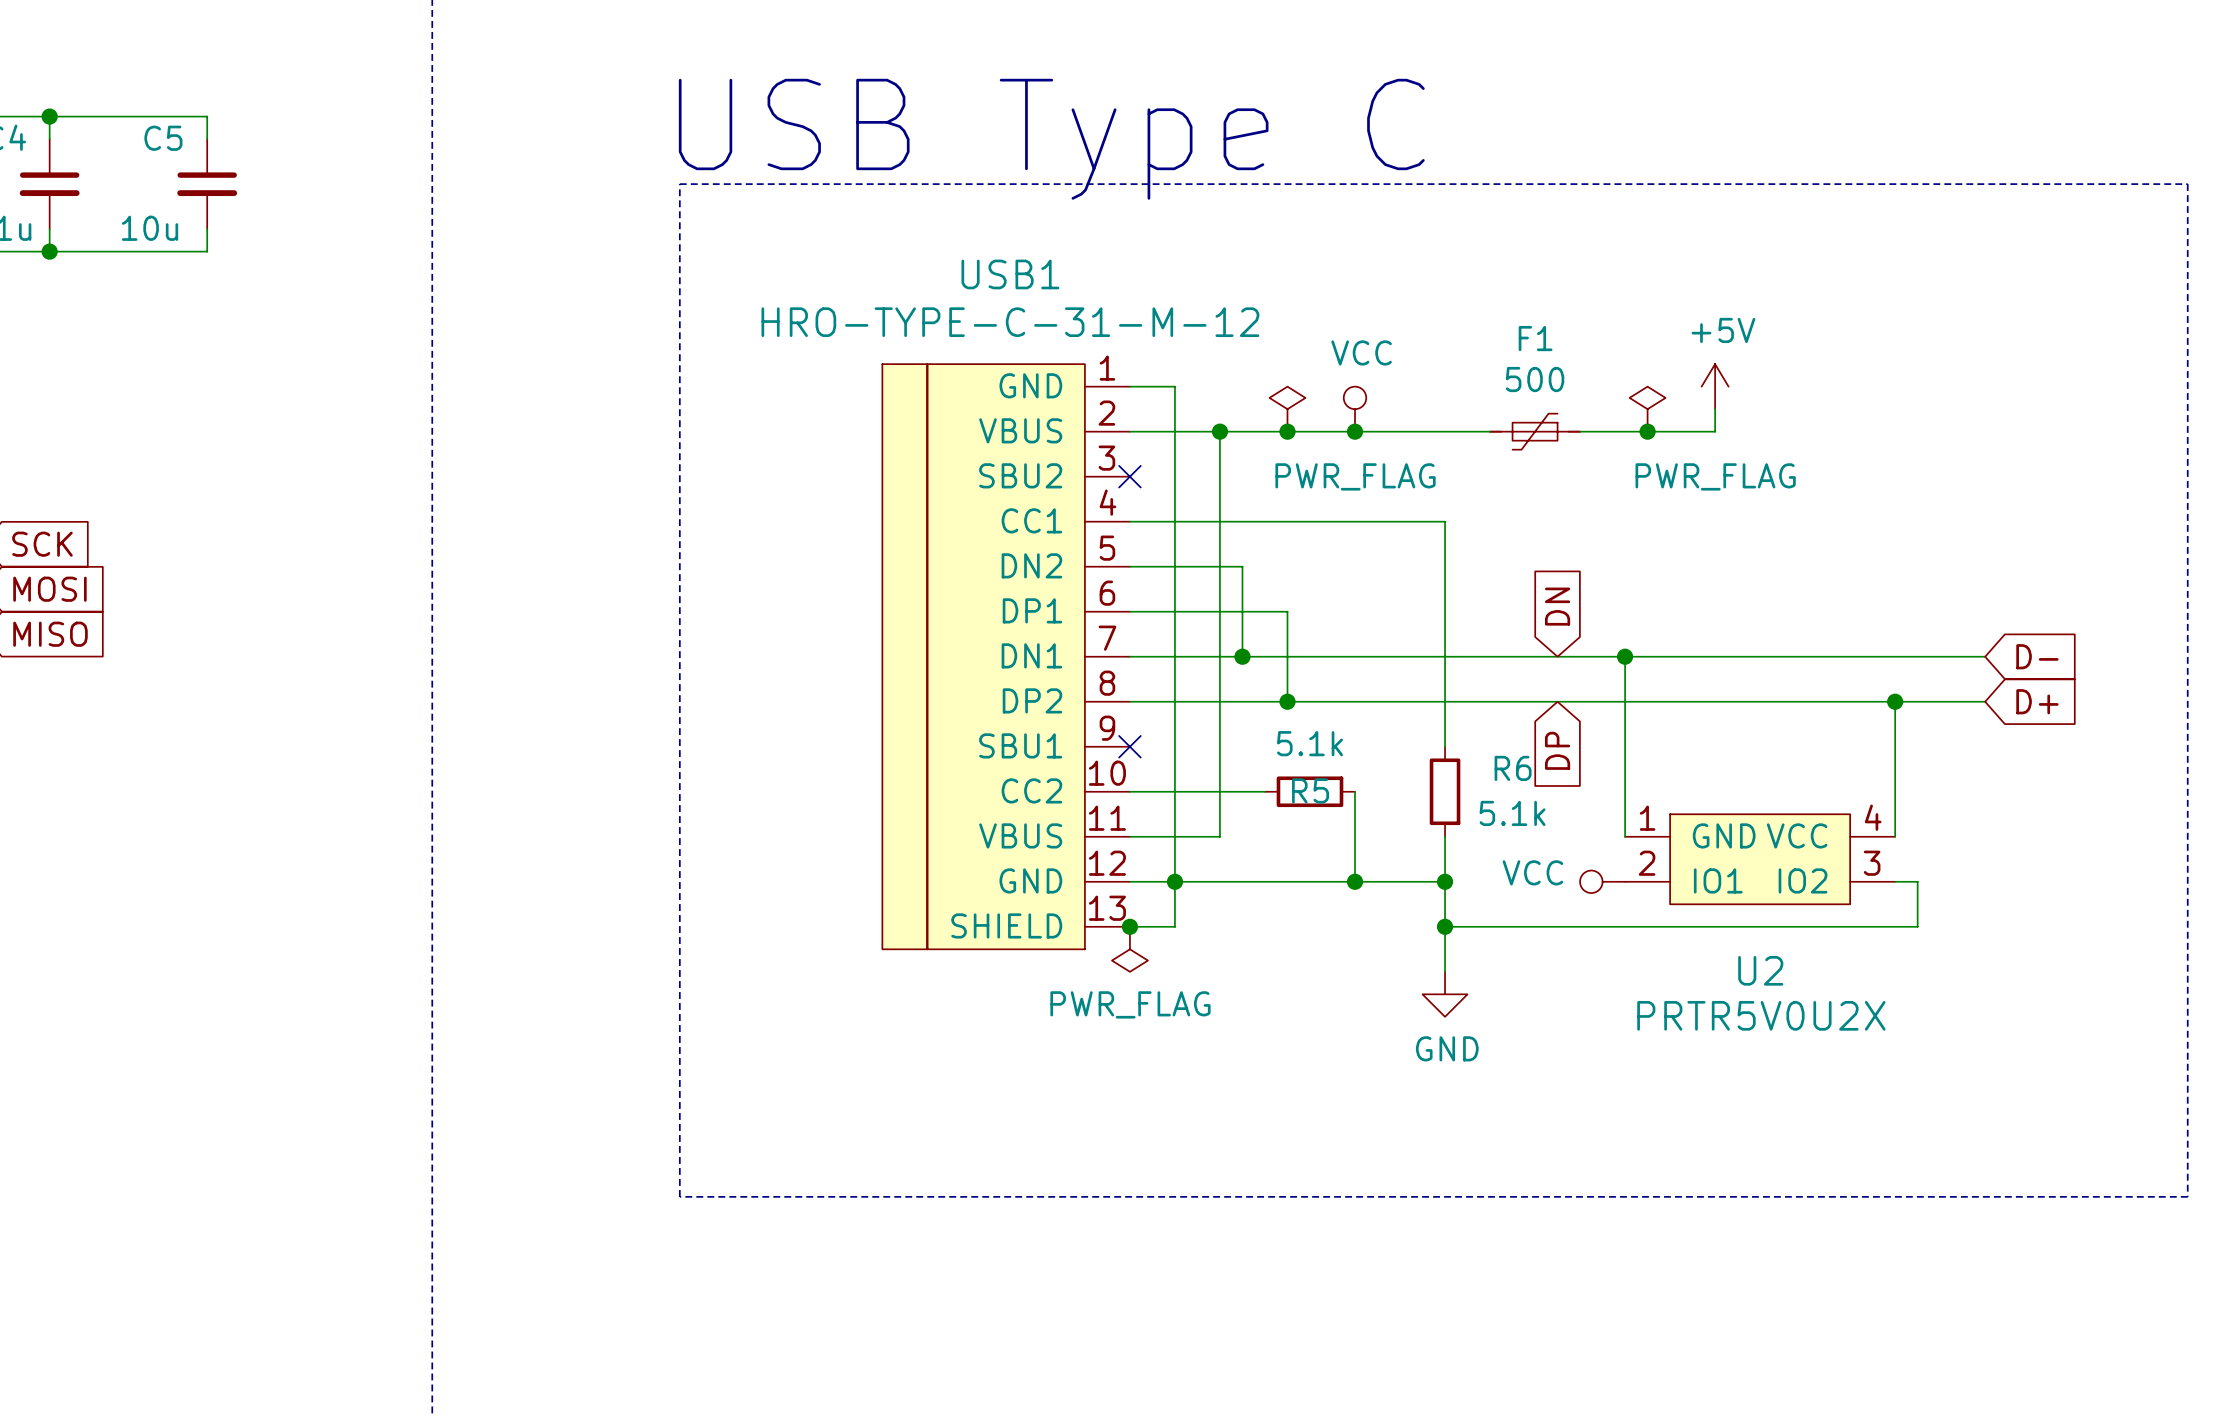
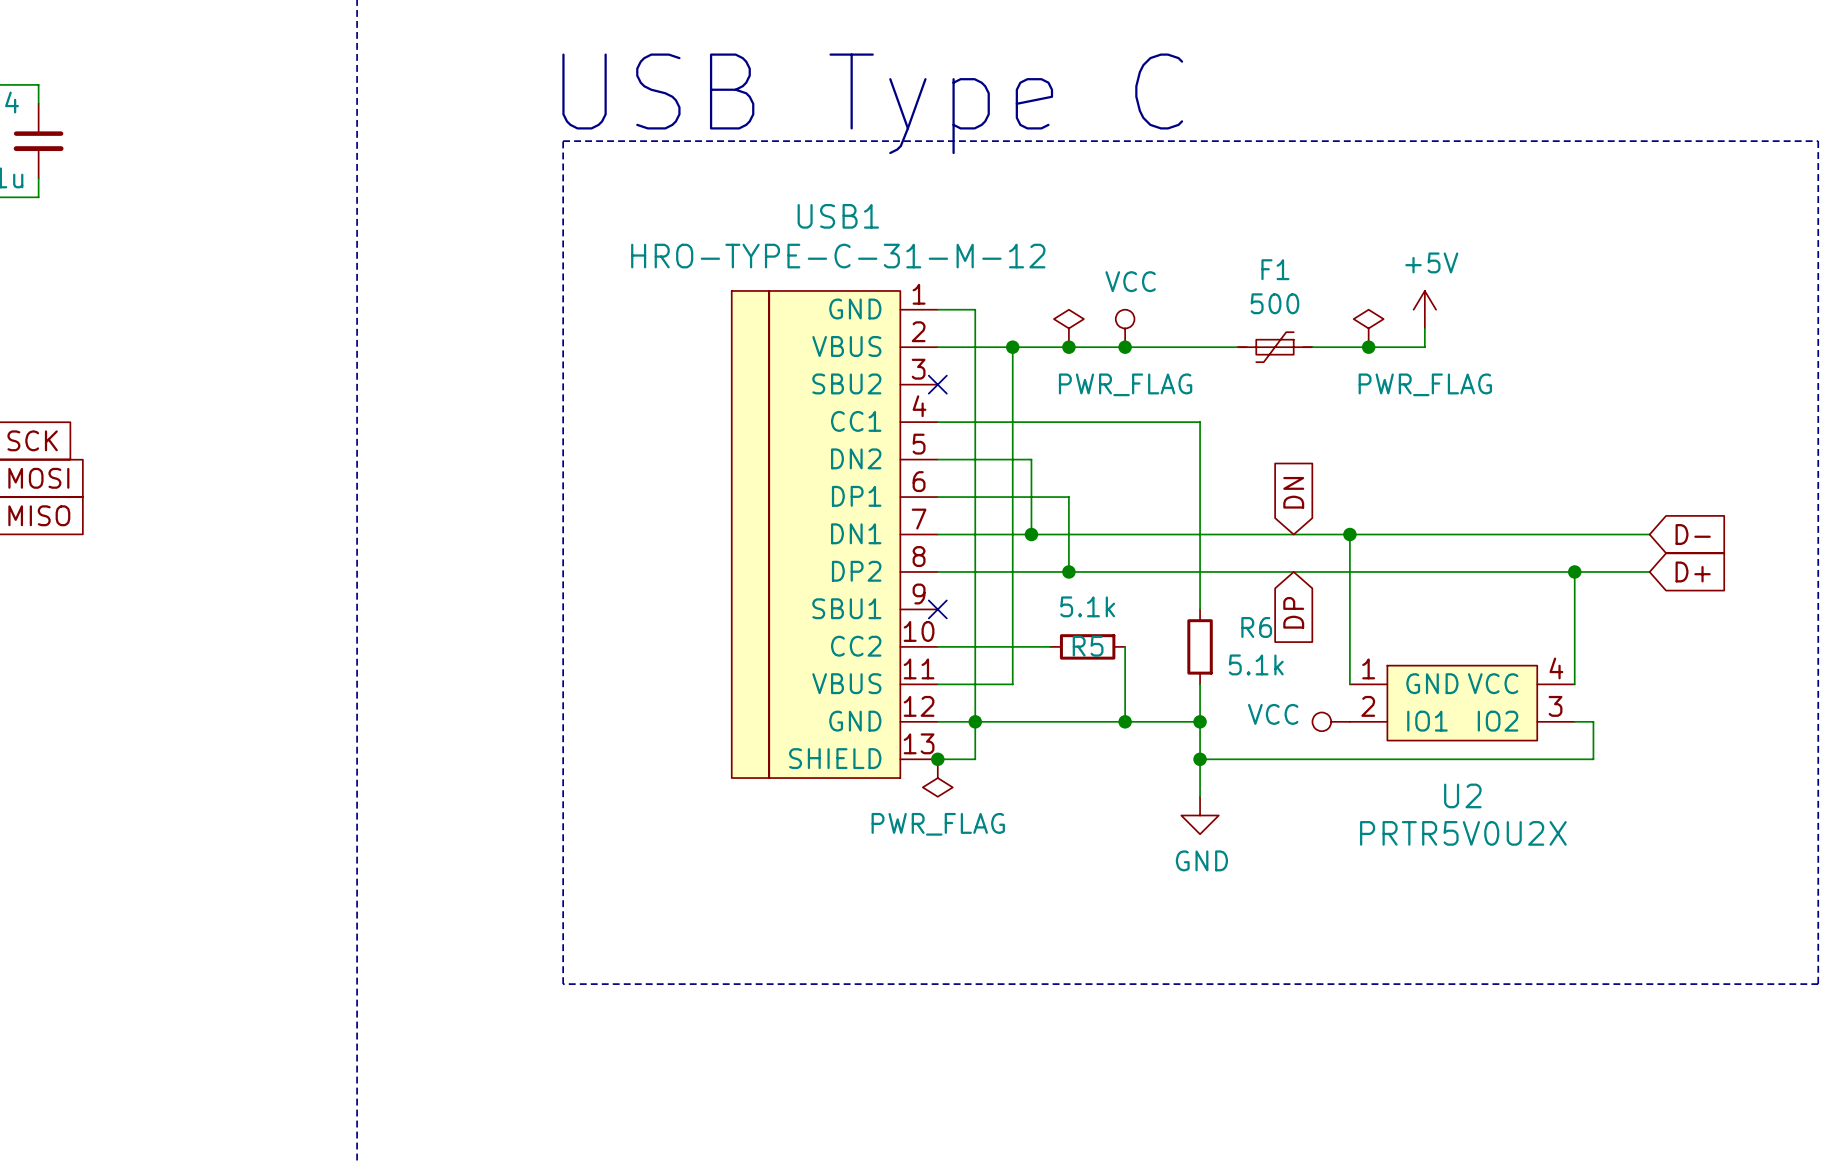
wire: (49, 116) (207, 116) (207, 139) -> none
junction: (49, 116) -> none
C5: 10u (207, 184) -> none
wire: (207, 229) (207, 251) (49, 251) -> none
junction: (49, 251) -> none

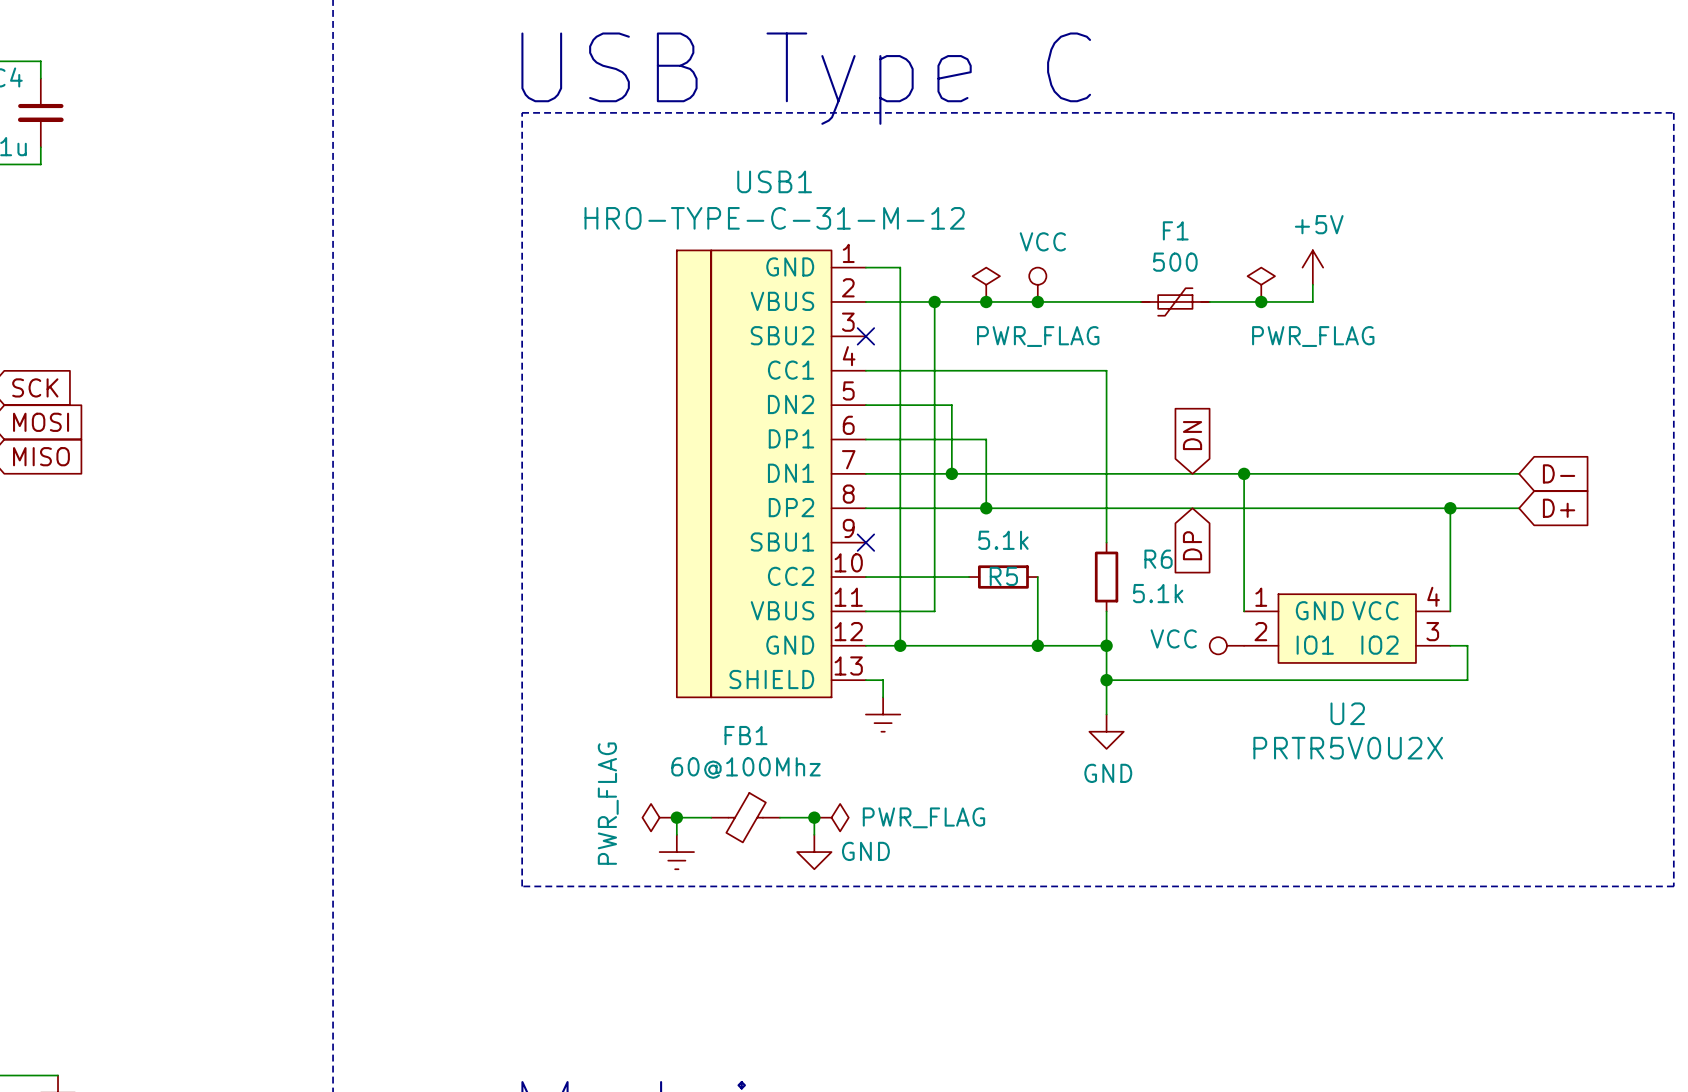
wire: (975, 721) (975, 759) (956, 759) -> (883, 697) (883, 680)
junction: (937, 759) -> none
power symbol: PWR_FLAG (937, 778) -> none
power symbol: none -> (883, 714)
power symbol: none -> PWR_FLAG (659, 817)
junction: none -> (676, 817)
wire: none -> (711, 817) (676, 817) (676, 834)
FB1: none -> 60@100Mhz (745, 817)
wire: none -> (779, 817) (814, 817) (814, 834)
junction: none -> (814, 817)
power symbol: none -> PWR_FLAG (831, 817)
power symbol: none -> (676, 852)
power symbol: none -> GND (814, 852)

